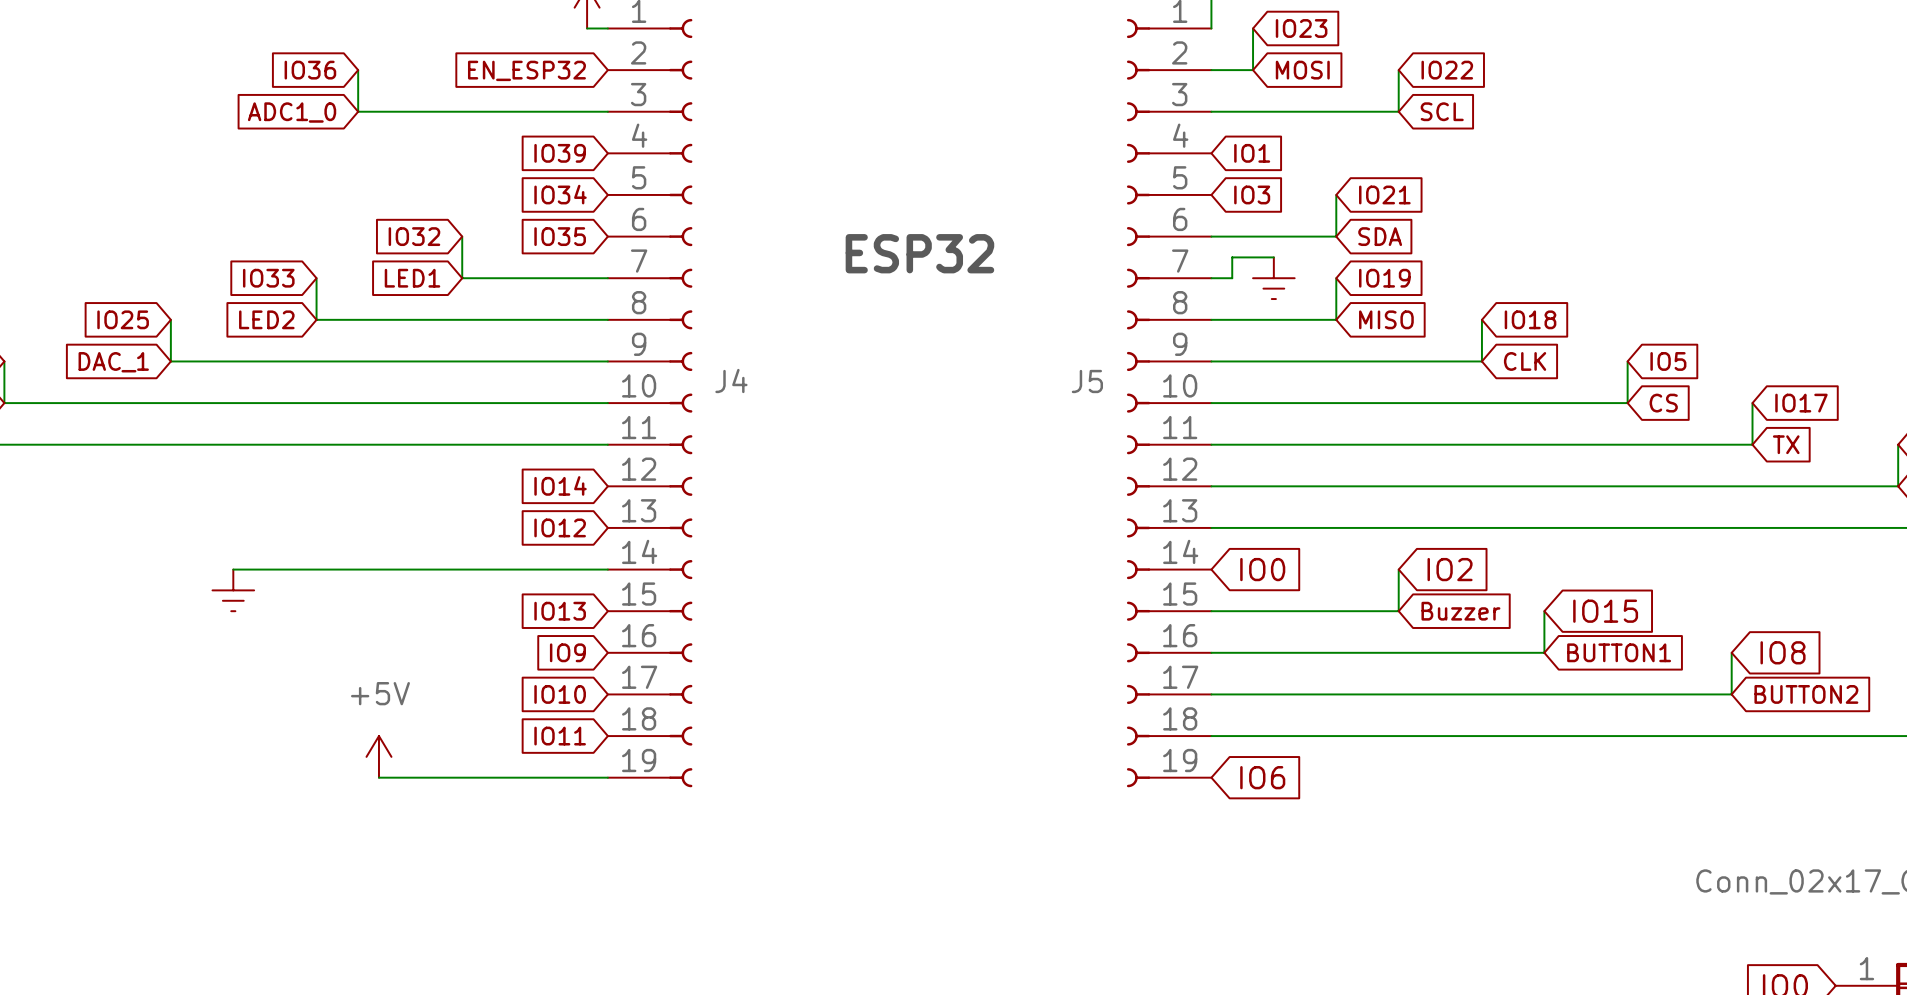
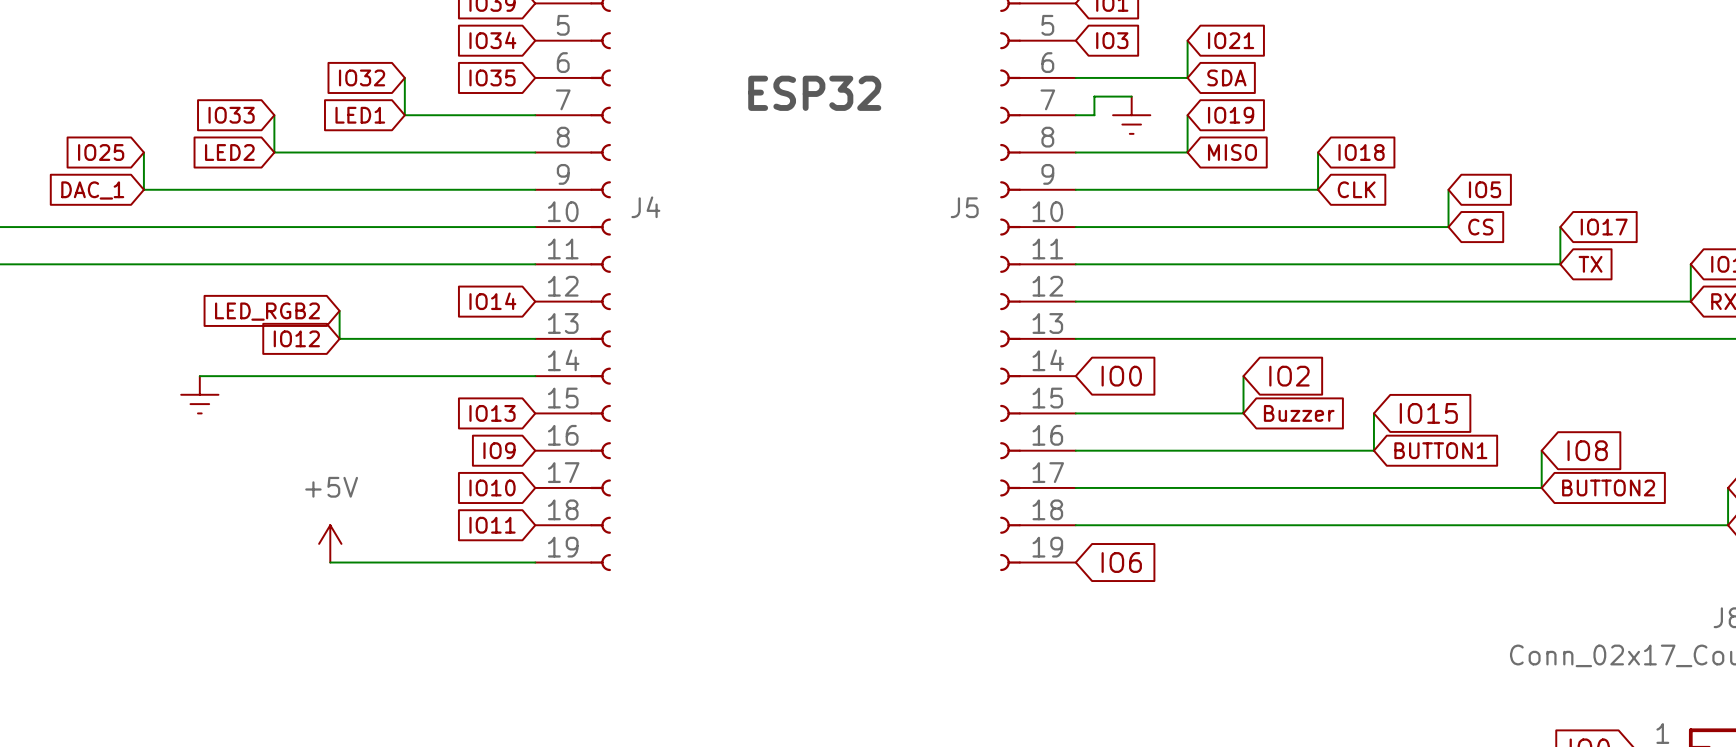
wire: none -> (339, 310) (339, 338) (535, 338)
global label: none -> LED_RGB2 (267, 311)
global label position: IO12 (560, 527) -> IO12 (296, 338)

